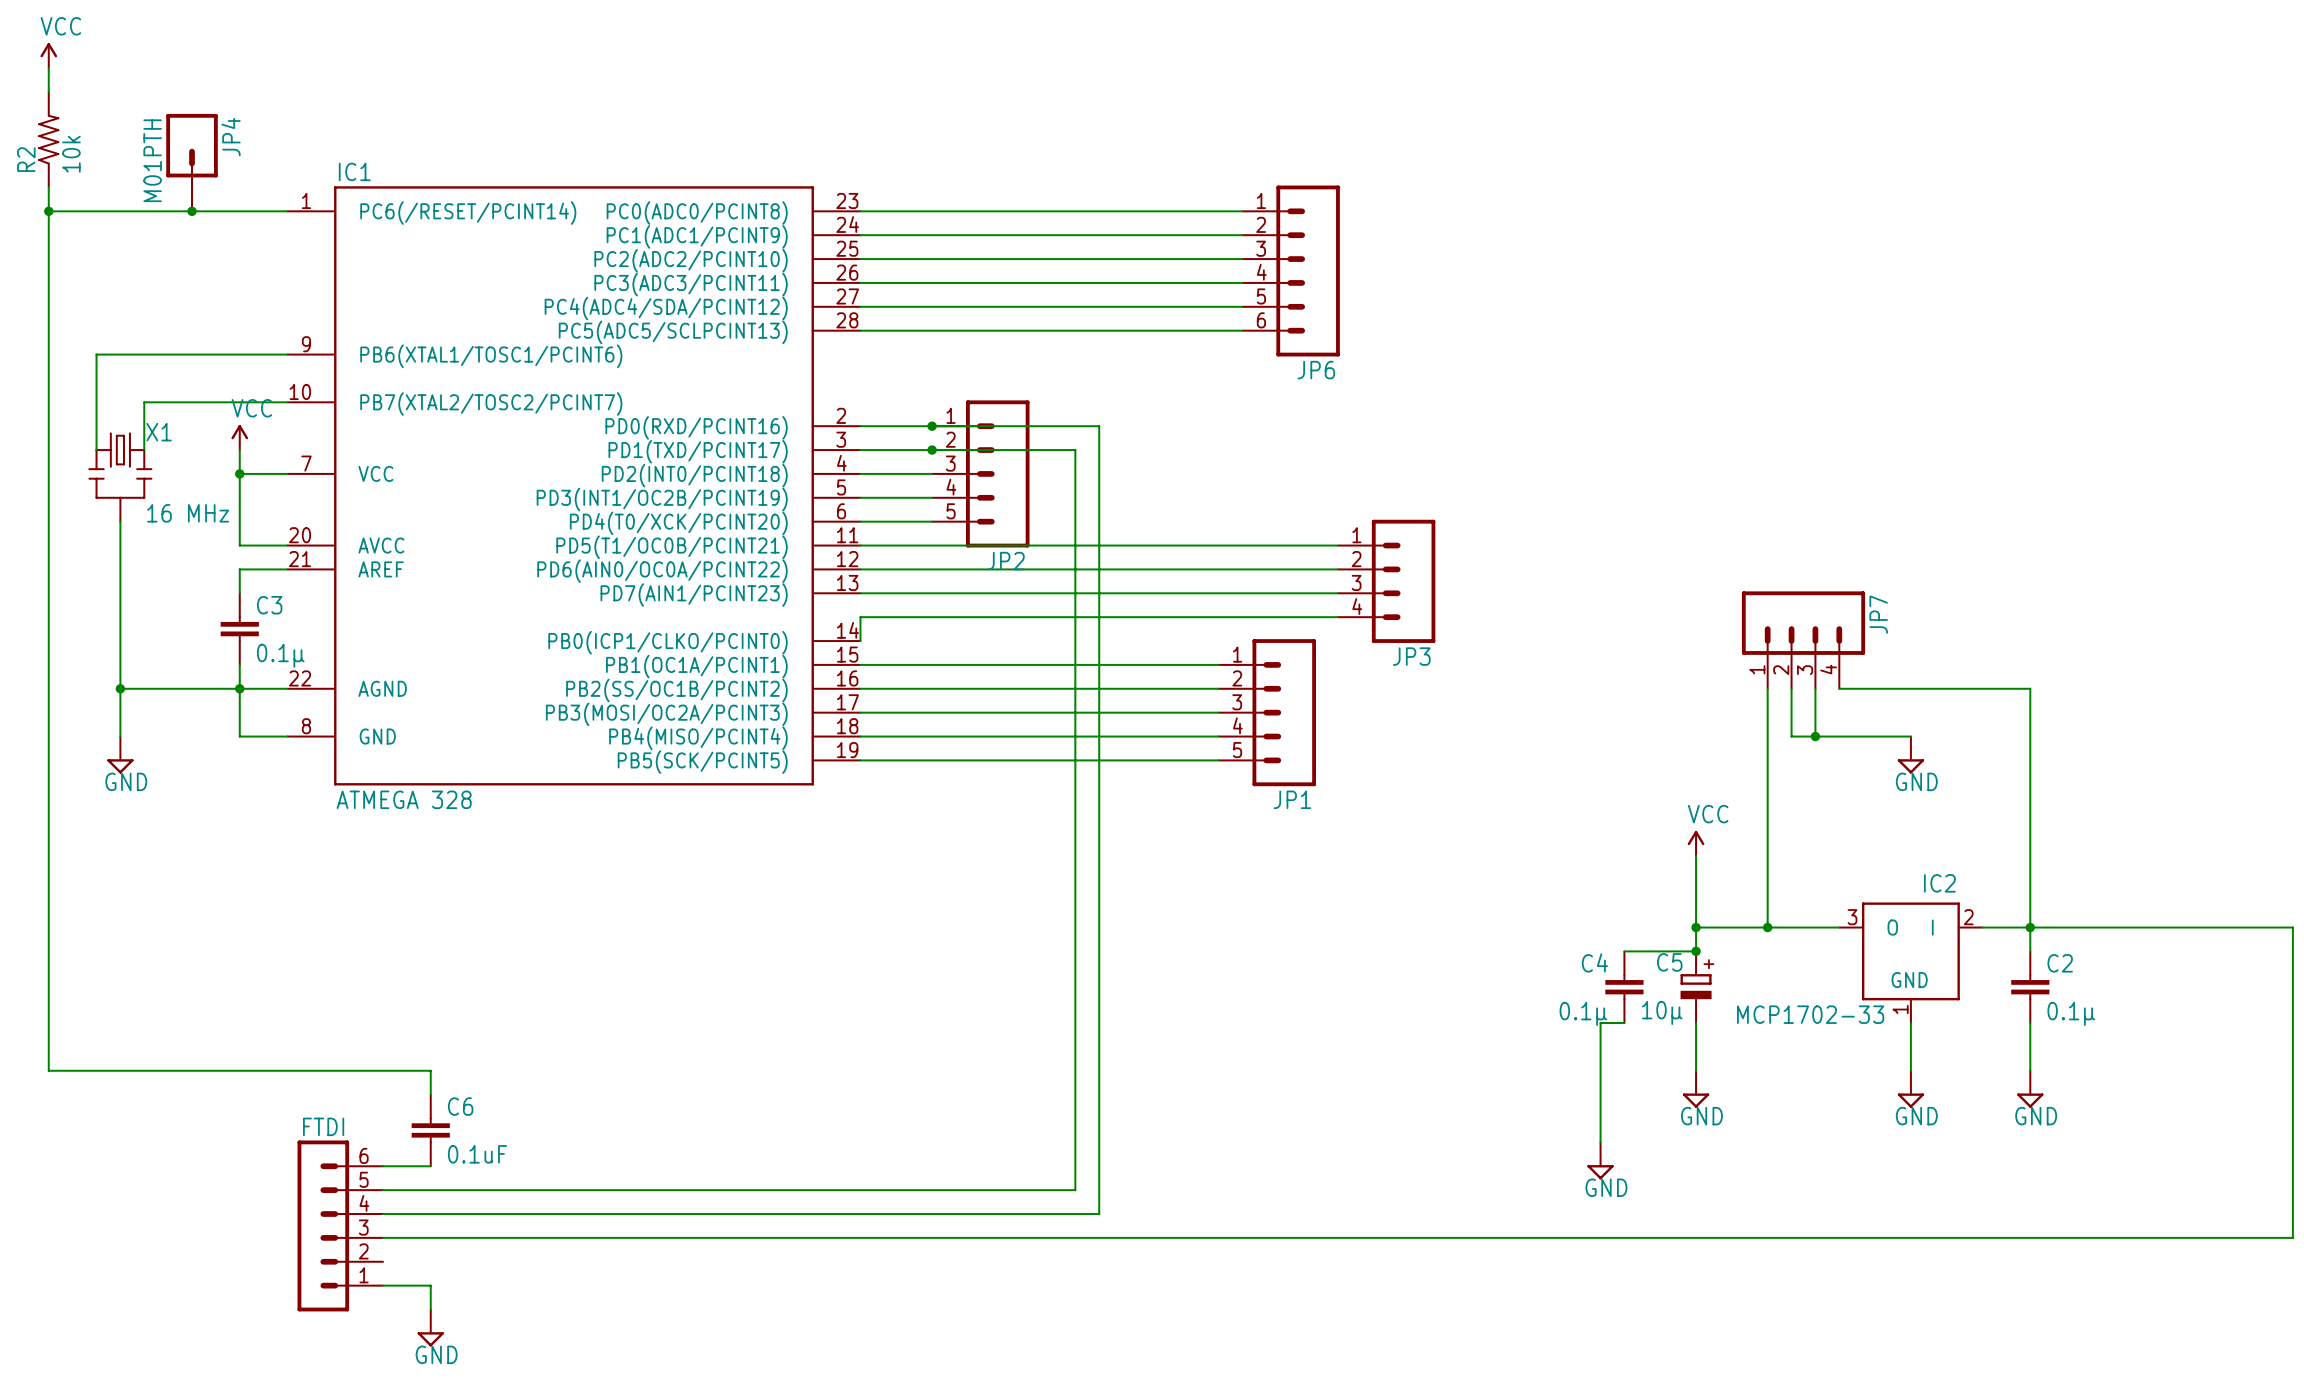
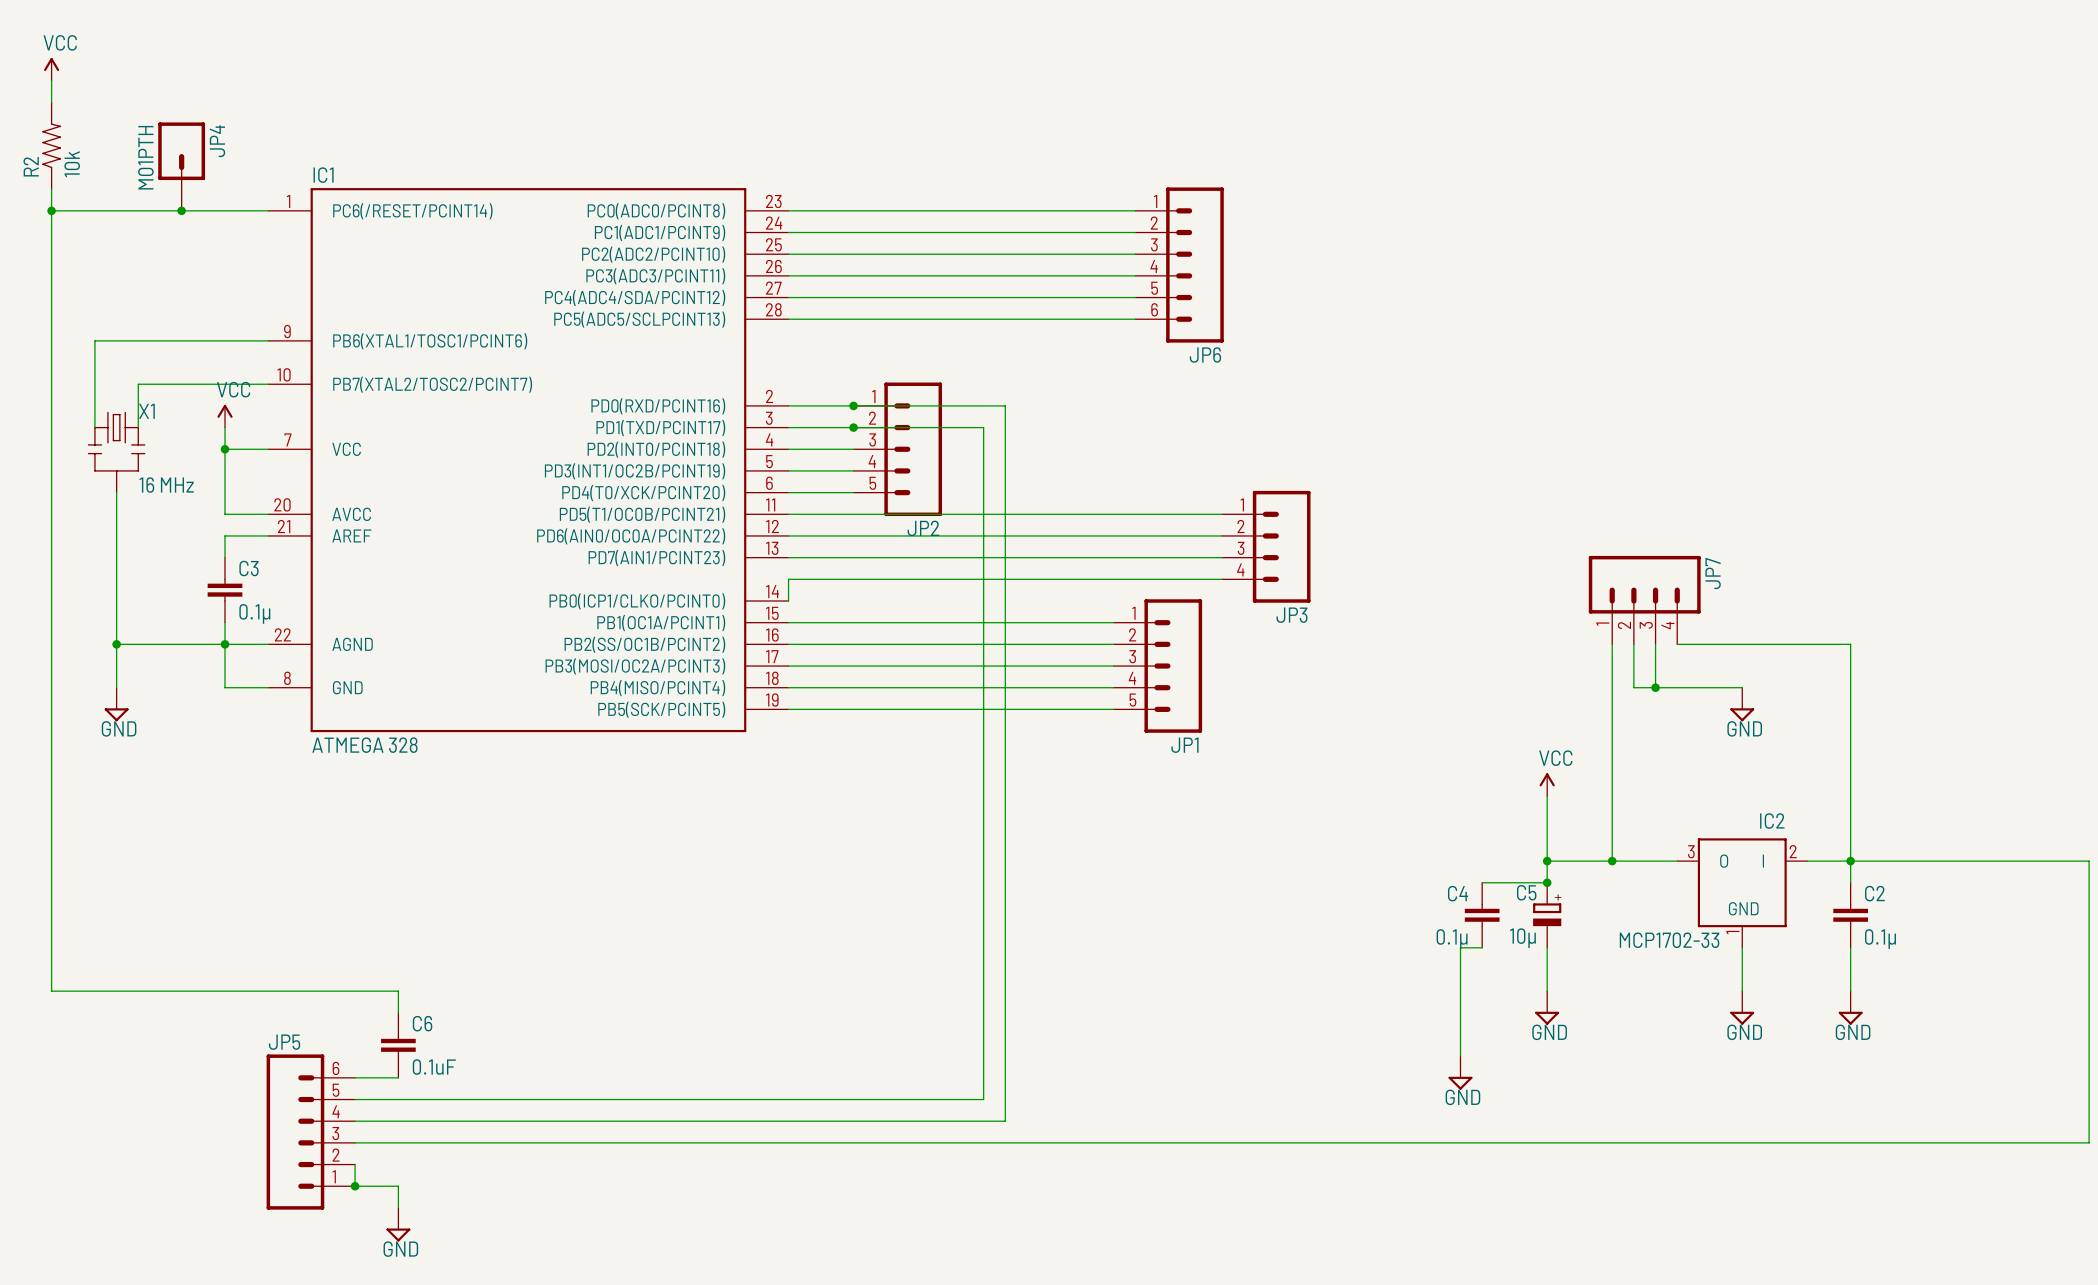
JP5: none -> (310, 1132)
FTDI: (340, 1225) -> none
wire: none -> (355, 1164) (355, 1186)
junction: none -> (355, 1186)

